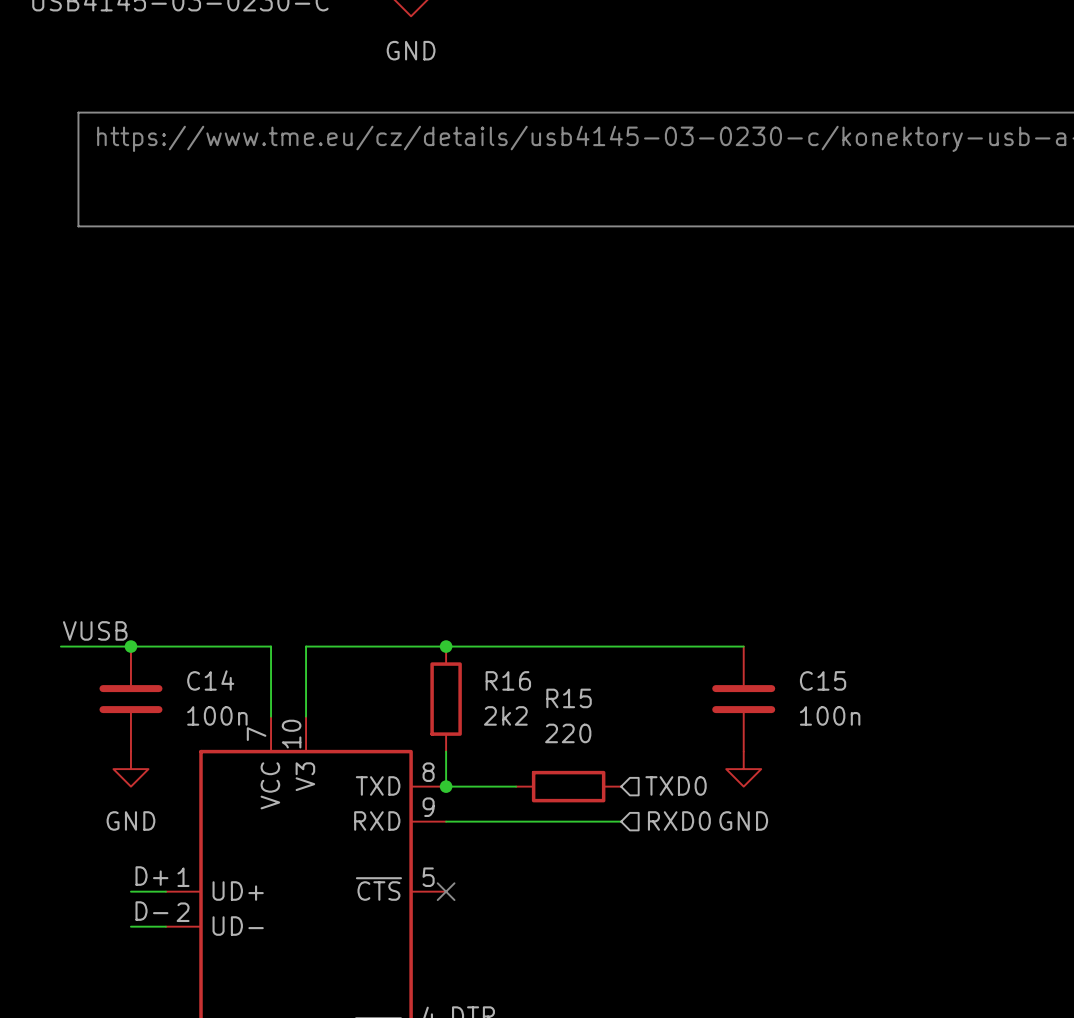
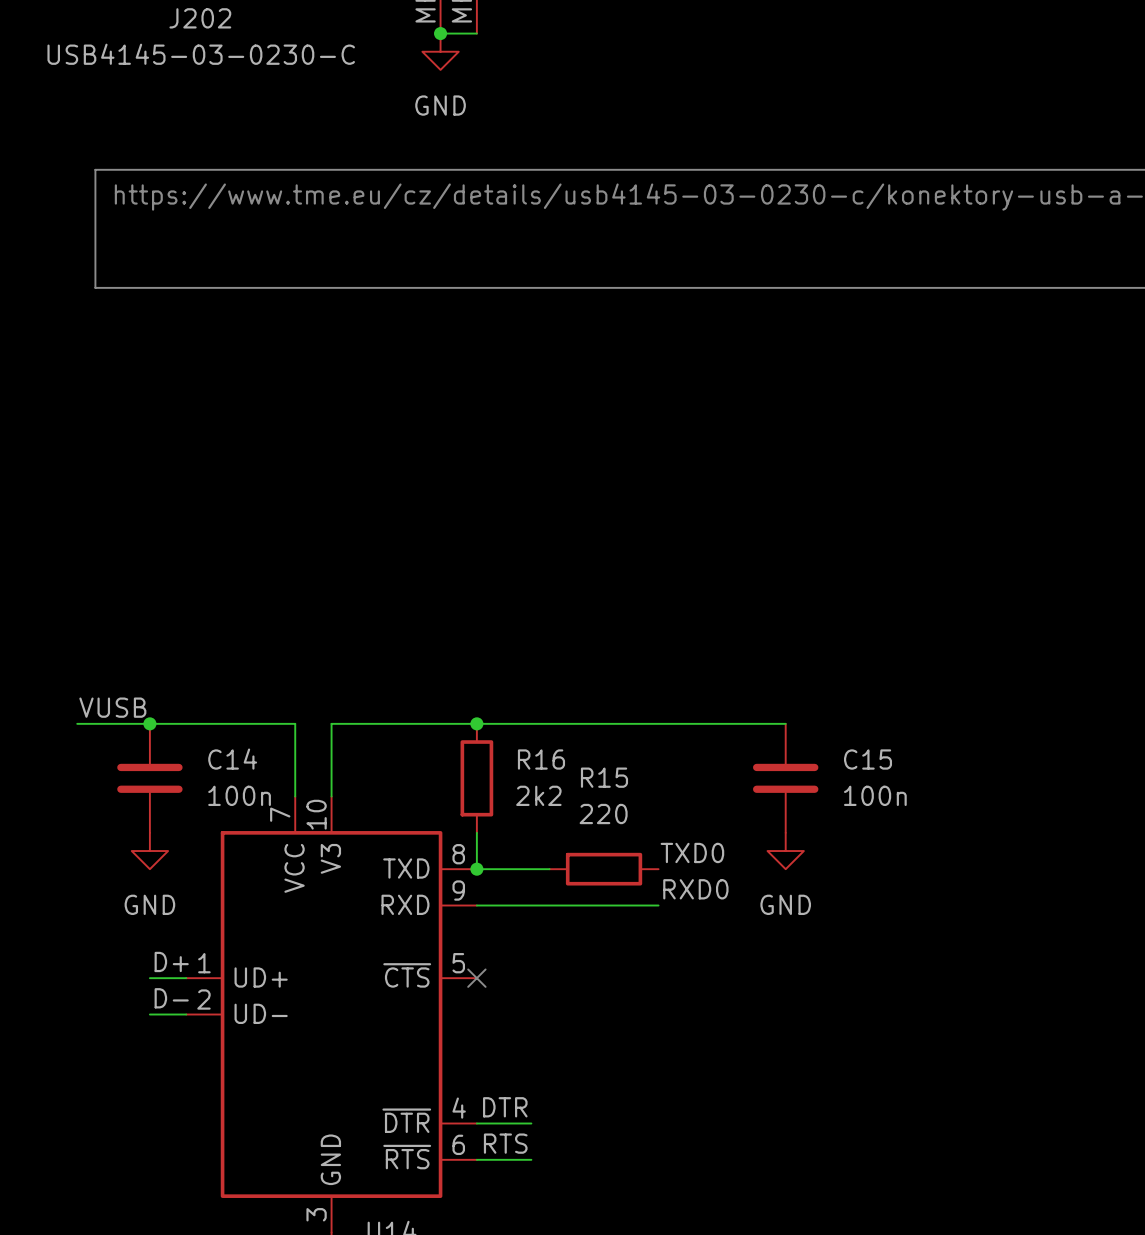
label: none -> TXD0 (692, 852)
hierarchical label: TXD0 (676, 785) -> none
label: none -> RXD0 (695, 889)
hierarchical label: RXD0 (679, 820) -> none

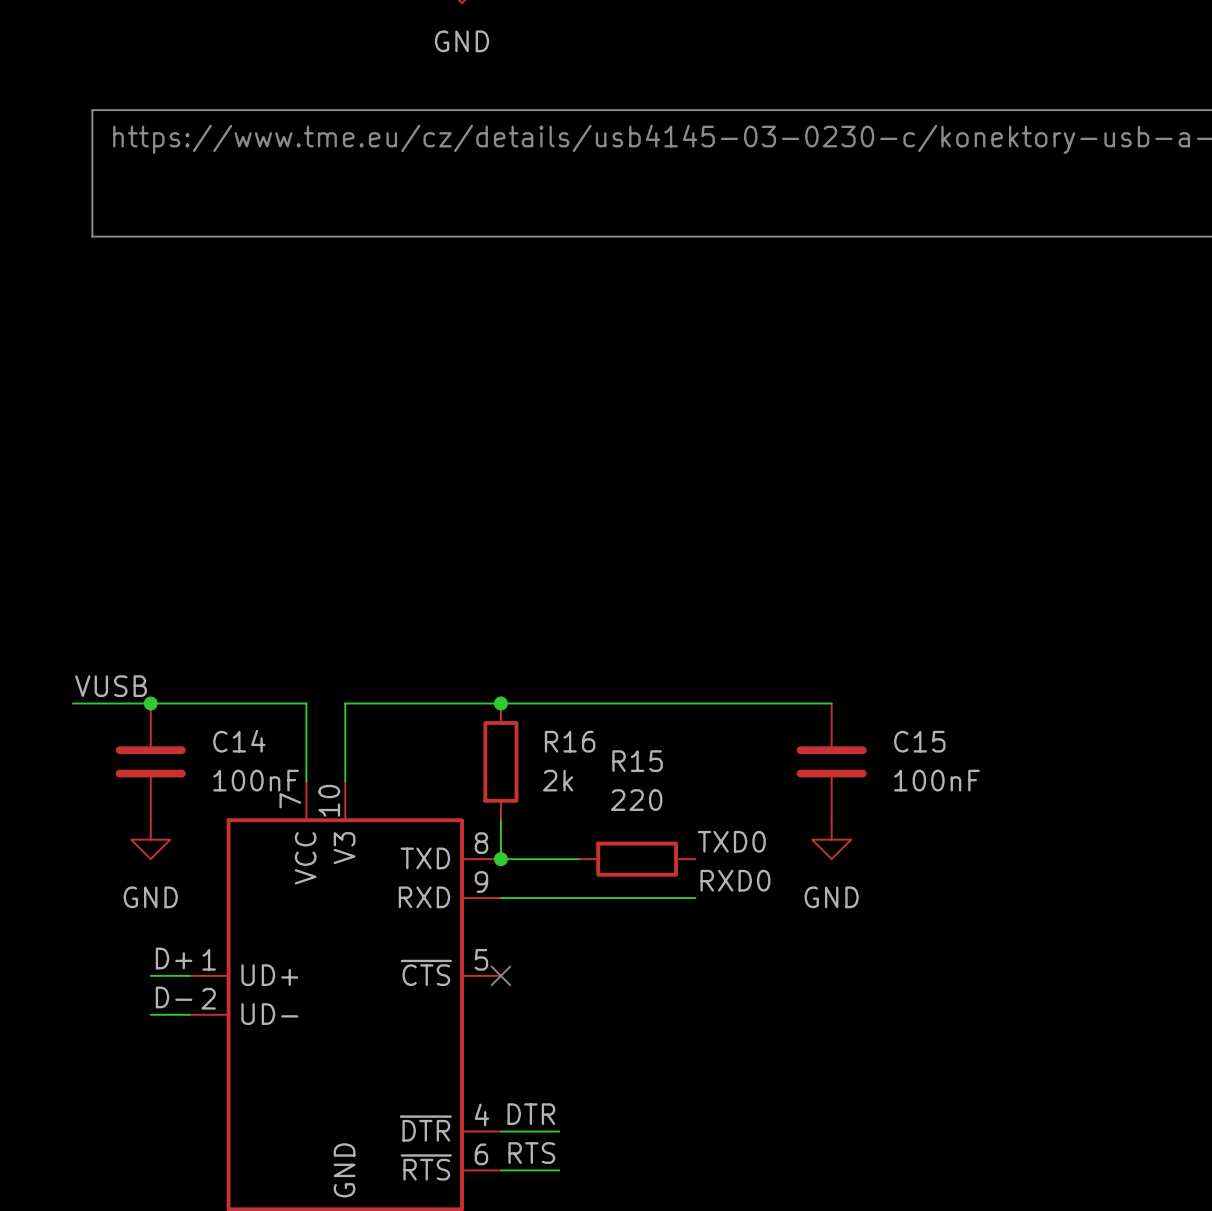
C14 value: 100n (239, 795) -> 100nF (256, 780)
R16 value: 2k2 (538, 795) -> 2k (558, 780)
C15 value: 100n (875, 795) -> 100nF (936, 780)

